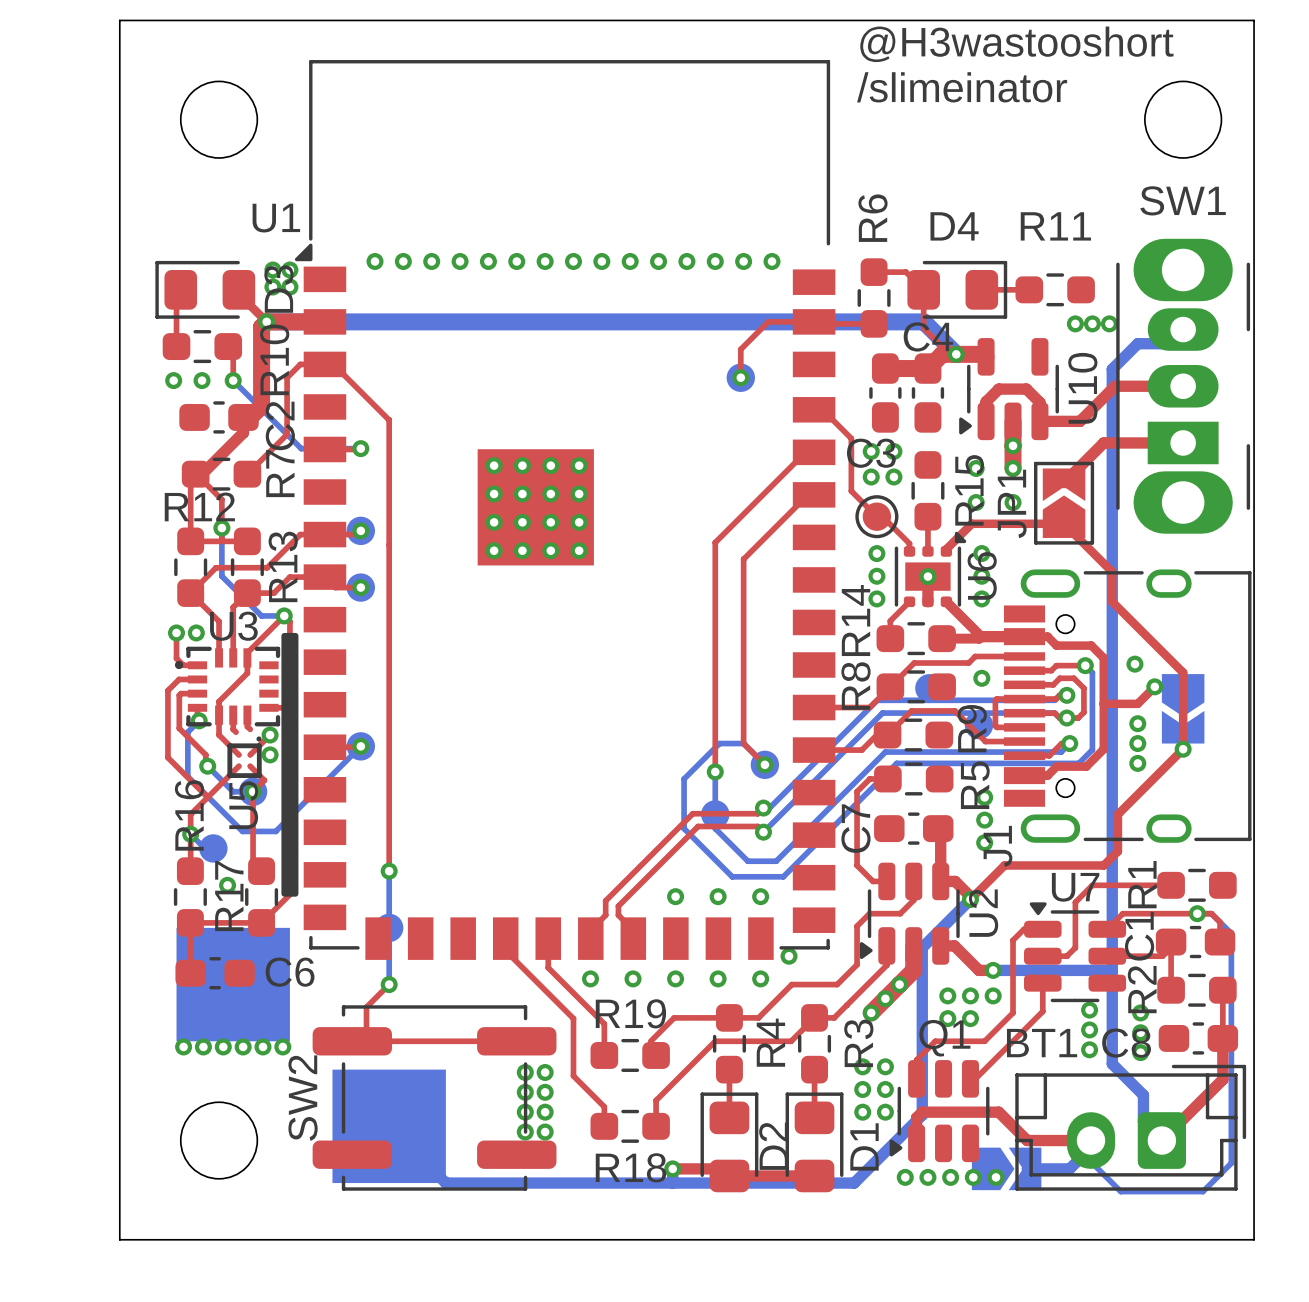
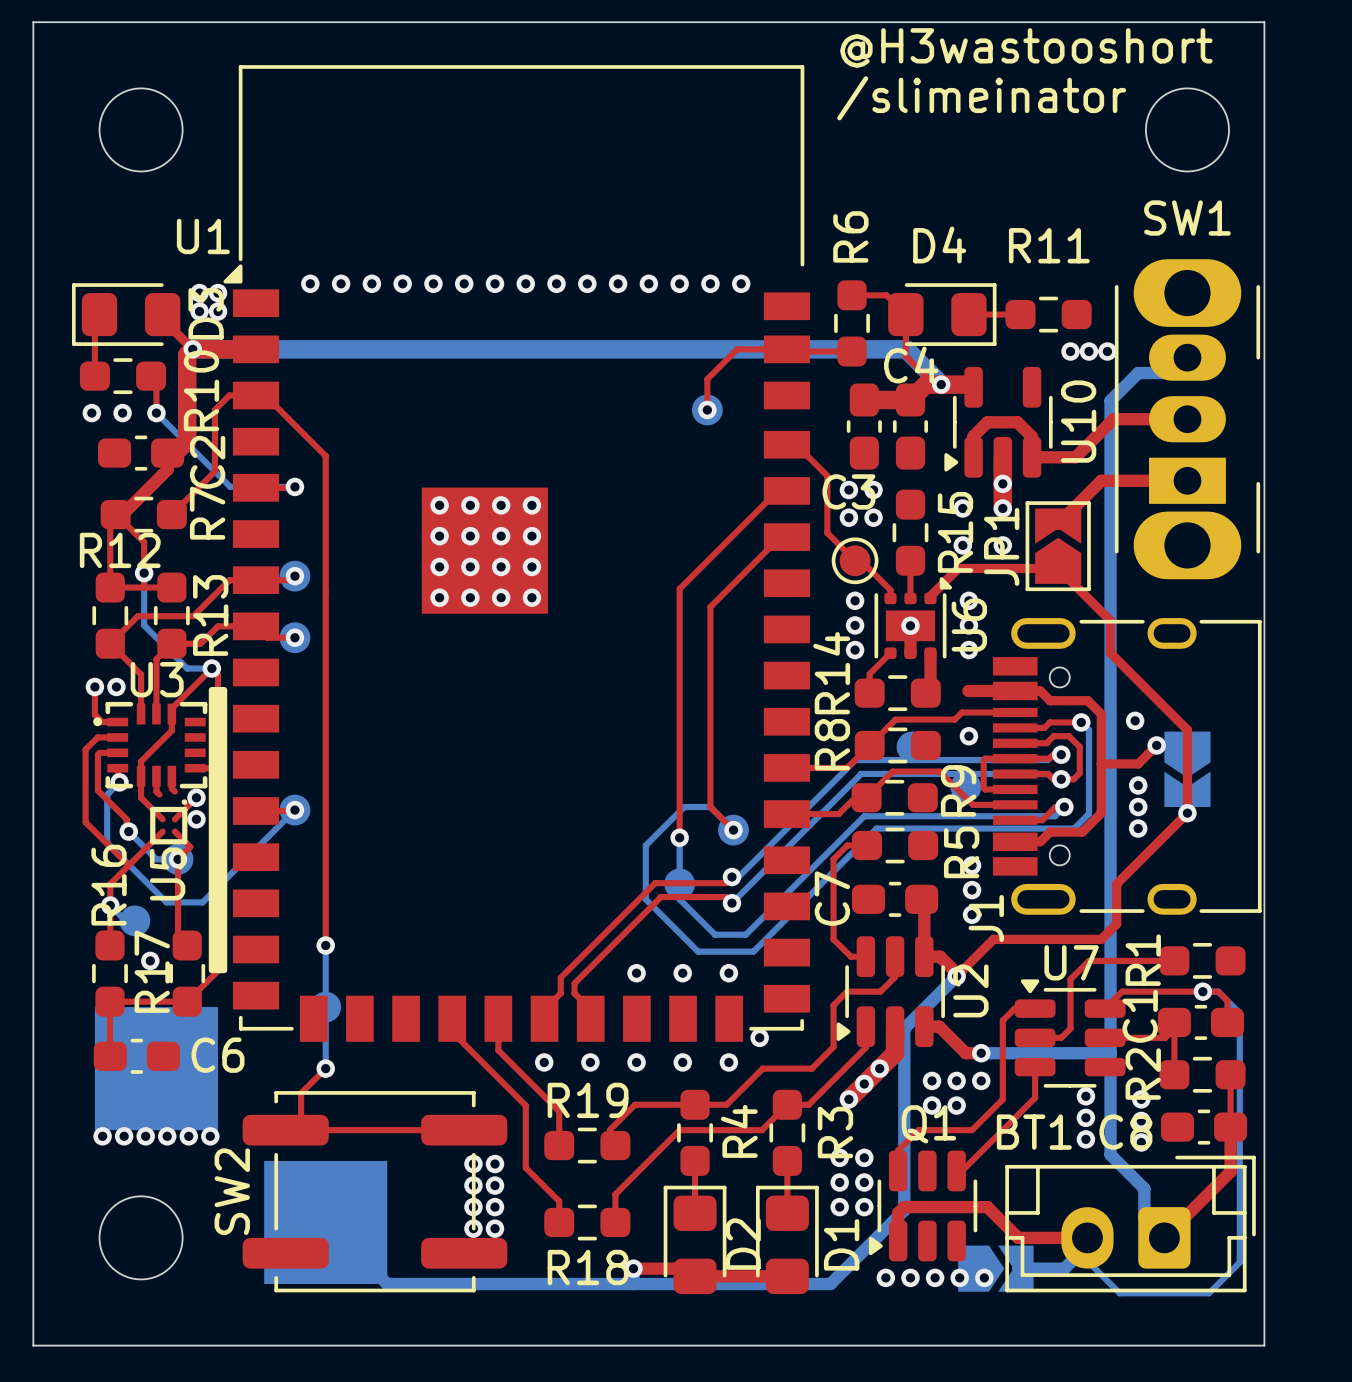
top track: (946, 601) (981, 636) (979, 638) (942, 638) -> (930, 653) (930, 688) (925, 693)

